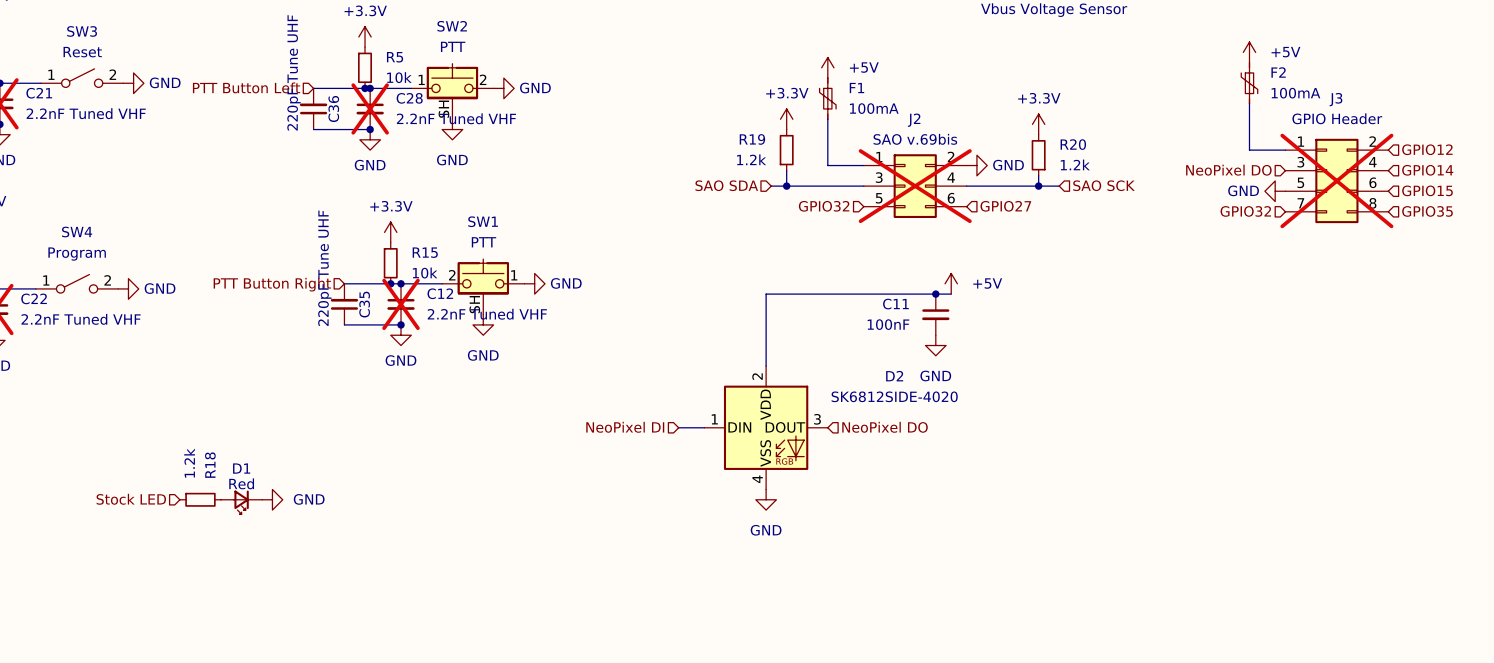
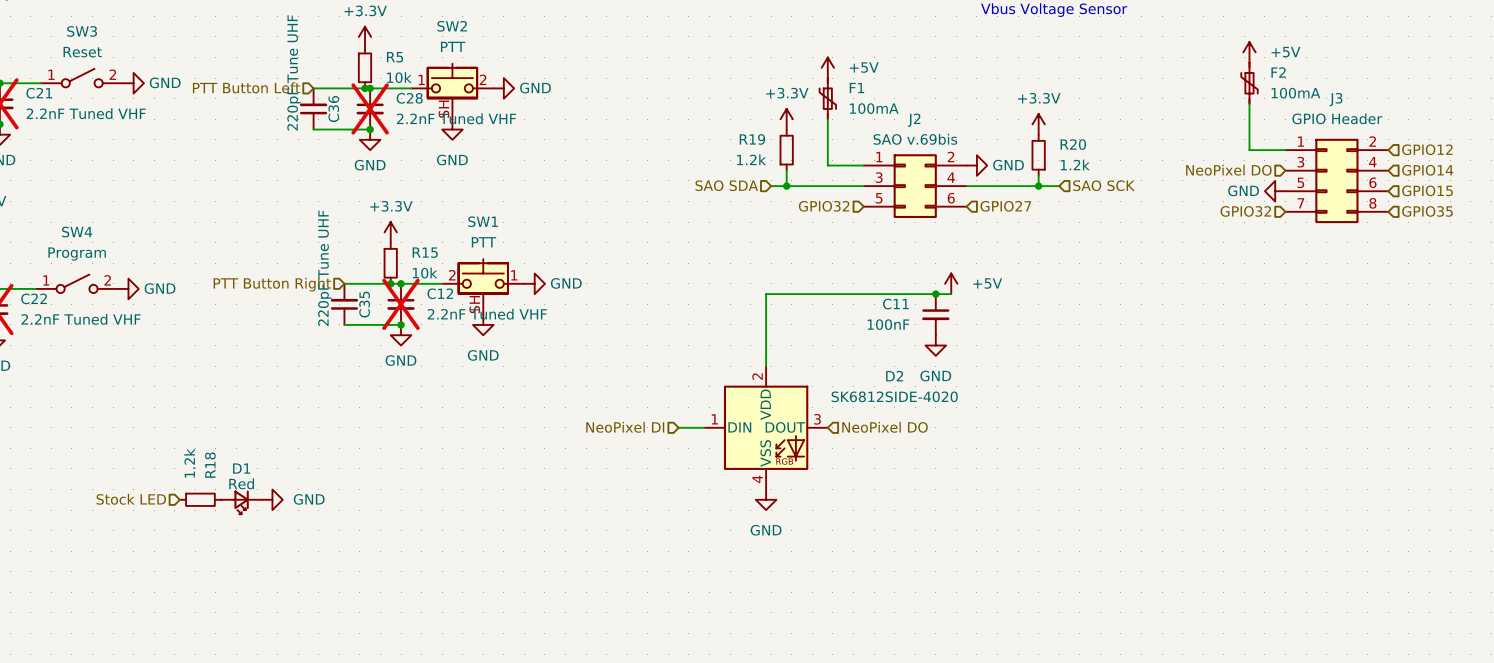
J3 do-not-place cross: (1336, 180) -> none
J2 do-not-place cross: (915, 186) -> none

